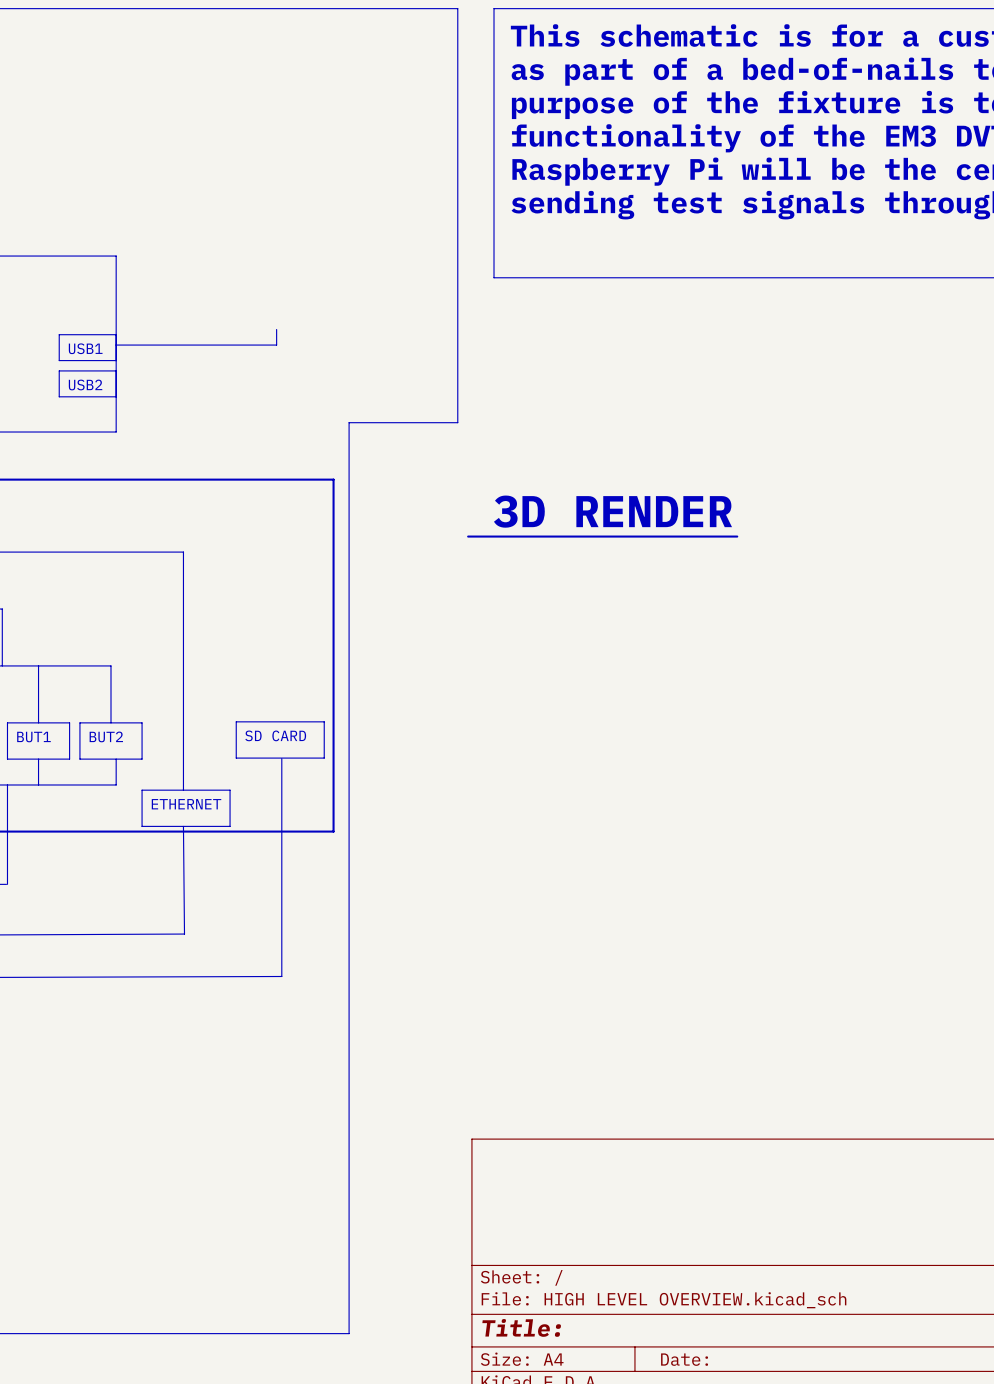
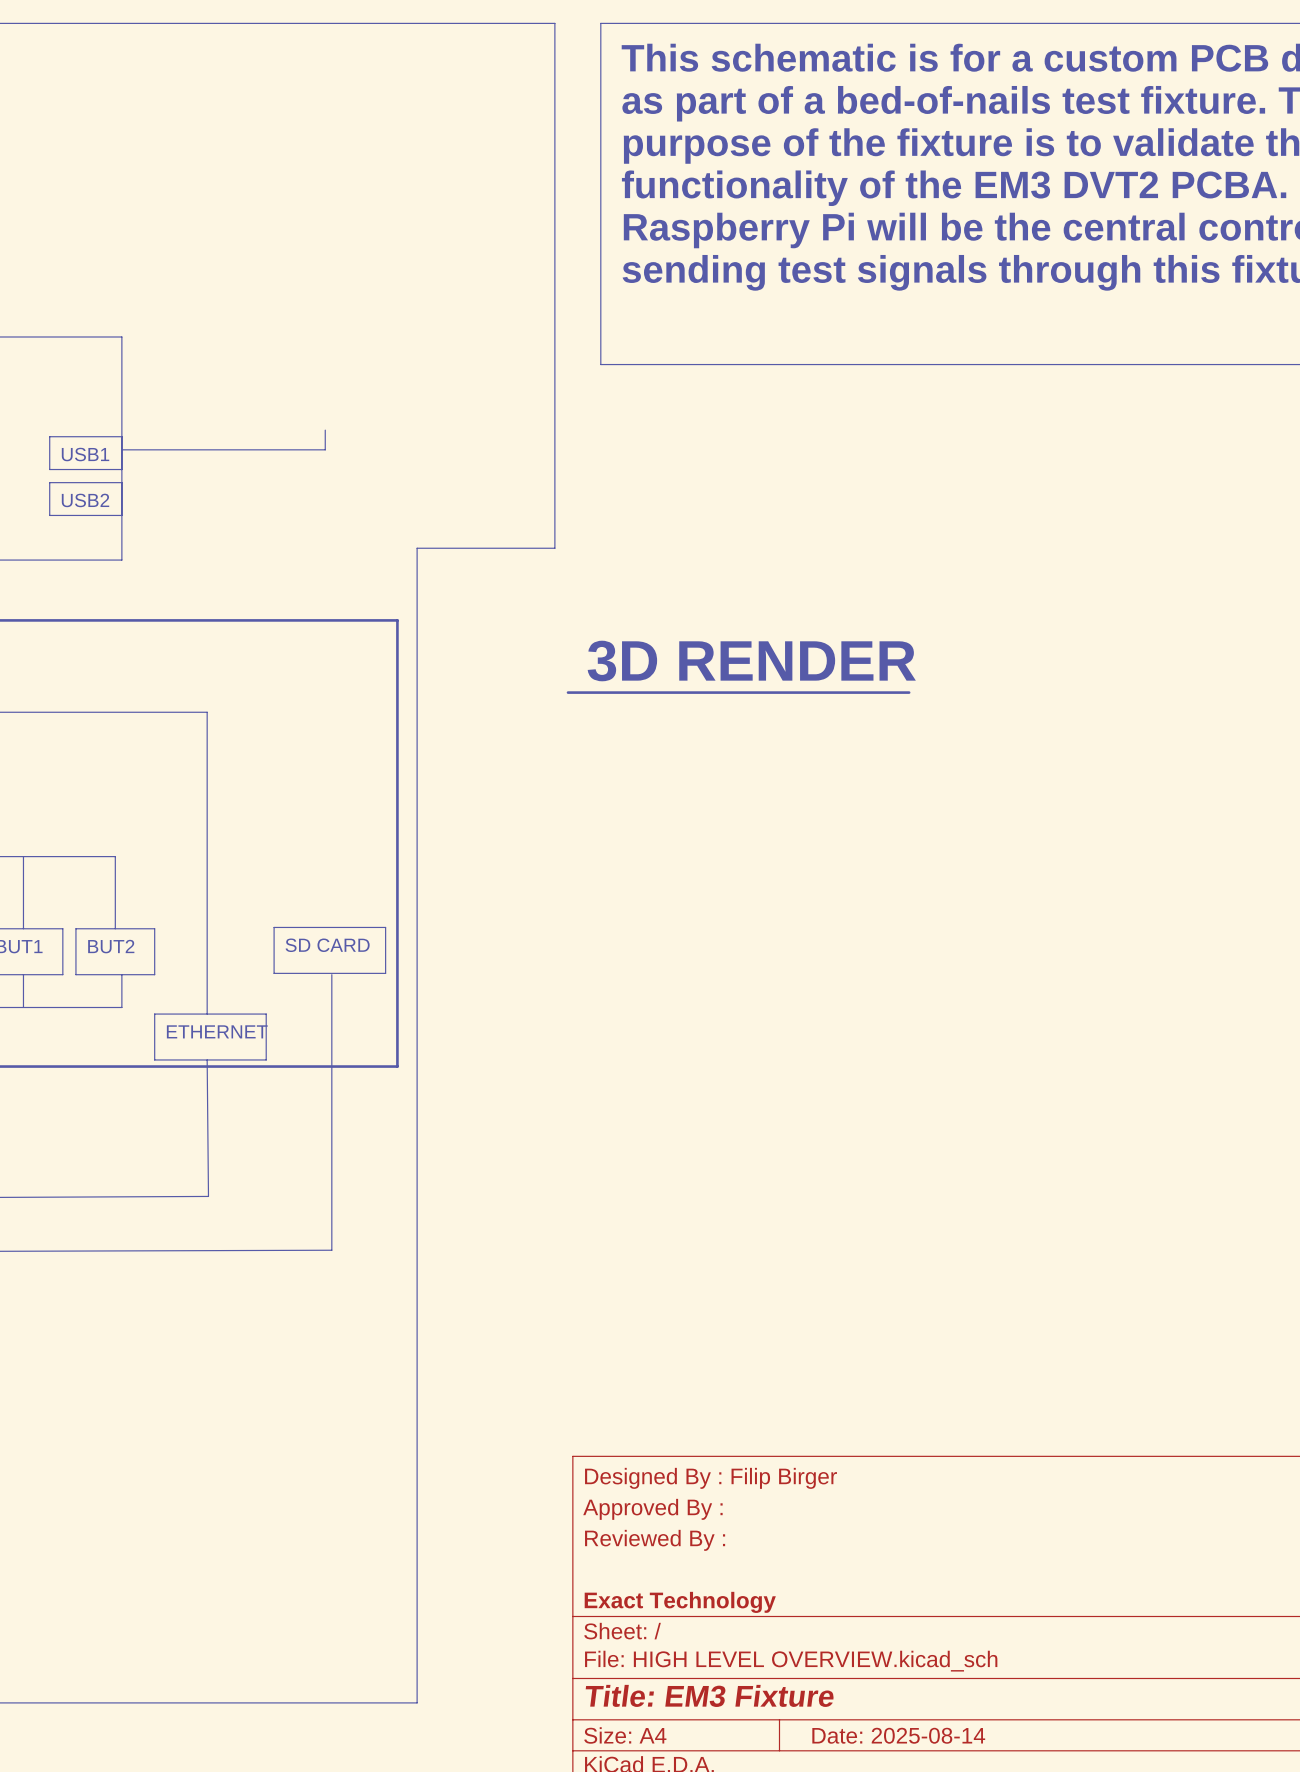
title block: none -> Designed By : Filip Birger (711, 1478)
title block: none -> Approved By : (652, 1509)
title block: none -> Reviewed By : (655, 1540)
title block: none -> Exact Technology (680, 1602)
title block: Title: (521, 1327) -> Title: EM3 Fixture (709, 1695)
title block: Date: (684, 1359) -> Date: 2025-08-14 (898, 1735)

